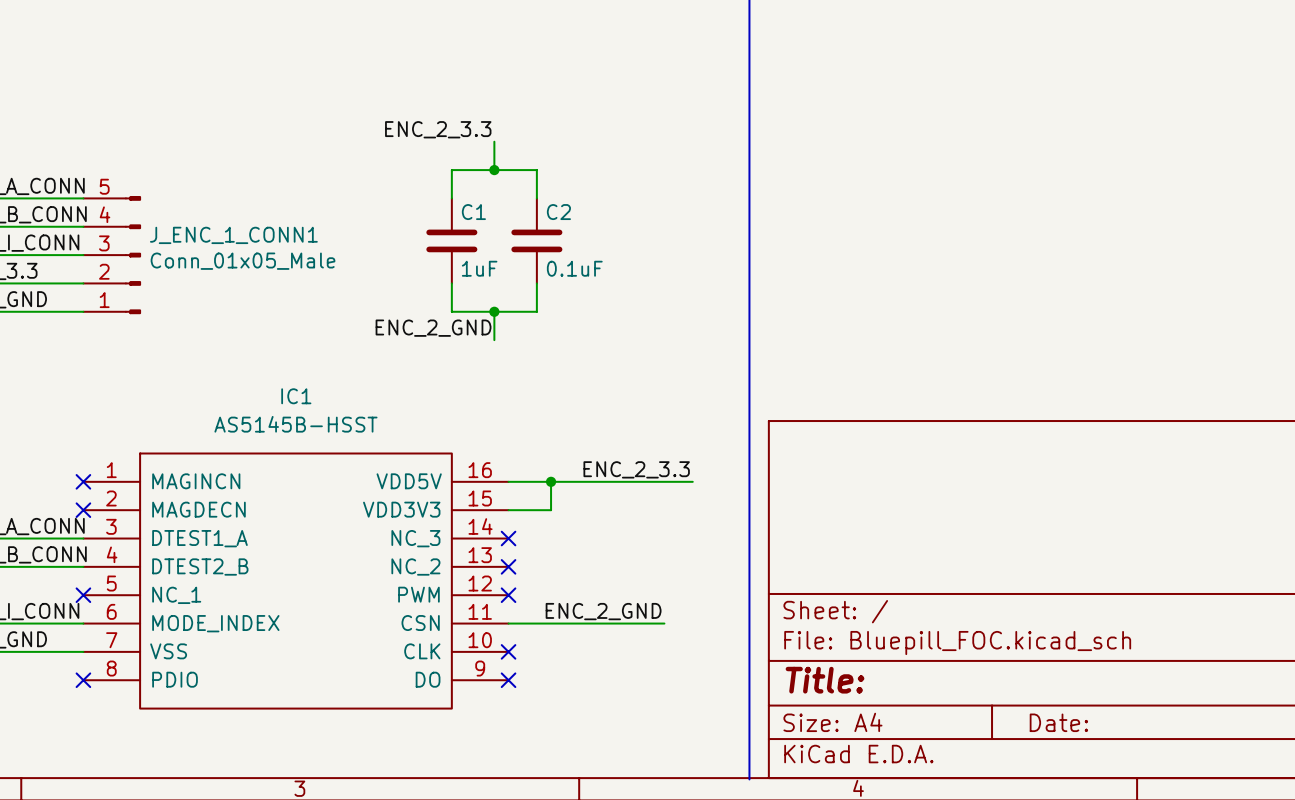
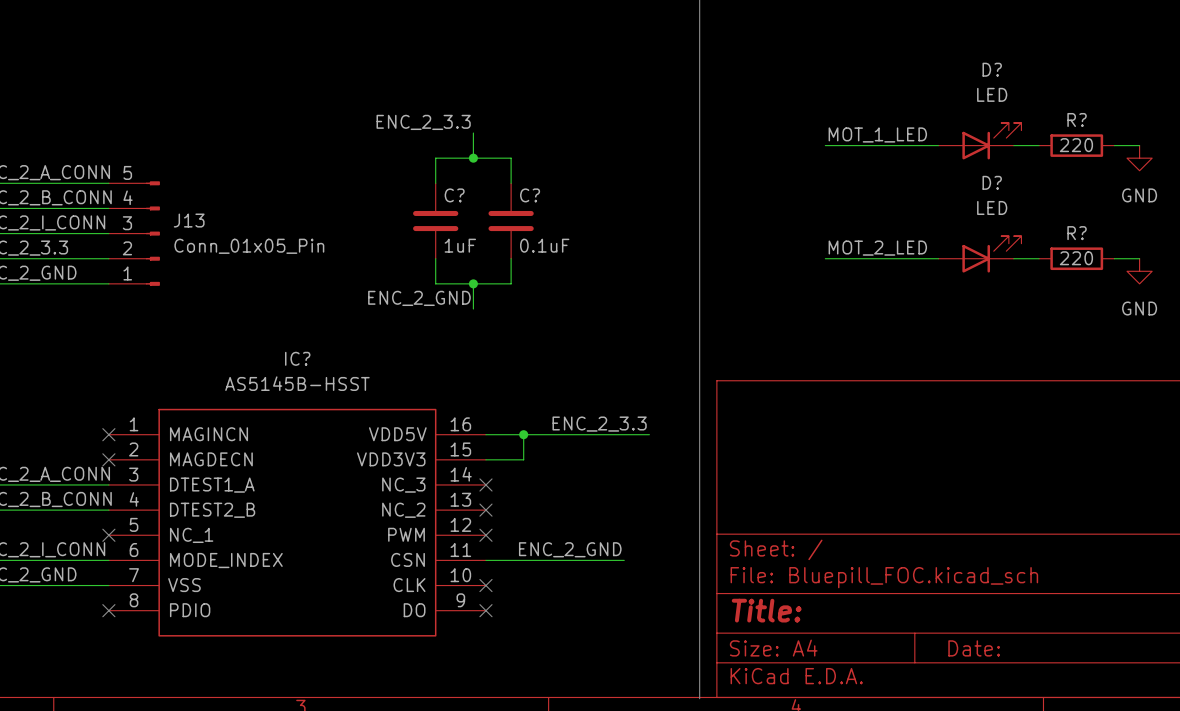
label: none -> MOT_1_LED (877, 134)
D?: none -> LED (979, 141)
wire: none -> (825, 145) (938, 145)
wire: none -> (1013, 145) (1039, 145)
R?: none -> 220 (1076, 145)
wire: none -> (1114, 145) (1139, 145)
power symbol: none -> GND (1139, 158)
C1 name: C1 (473, 212) -> C? (454, 195)
C2 name: C2 (558, 212) -> C? (530, 195)
J_ENC_1_CONN1 name: J_ENC_1_CONN1 (233, 235) -> J13 (189, 220)
J_ENC_1_CONN1 value: Conn_01x05_Male (243, 261) -> Conn_01x05_Pin (249, 246)
label: none -> MOT_2_LED (877, 248)
D?: none -> LED (979, 254)
wire: none -> (825, 258) (938, 258)
wire: none -> (1013, 258) (1039, 258)
R?: none -> 220 (1076, 258)
wire: none -> (1114, 258) (1139, 258)
power symbol: none -> GND (1139, 271)
IC1 name: IC1 (296, 396) -> IC? (297, 358)

